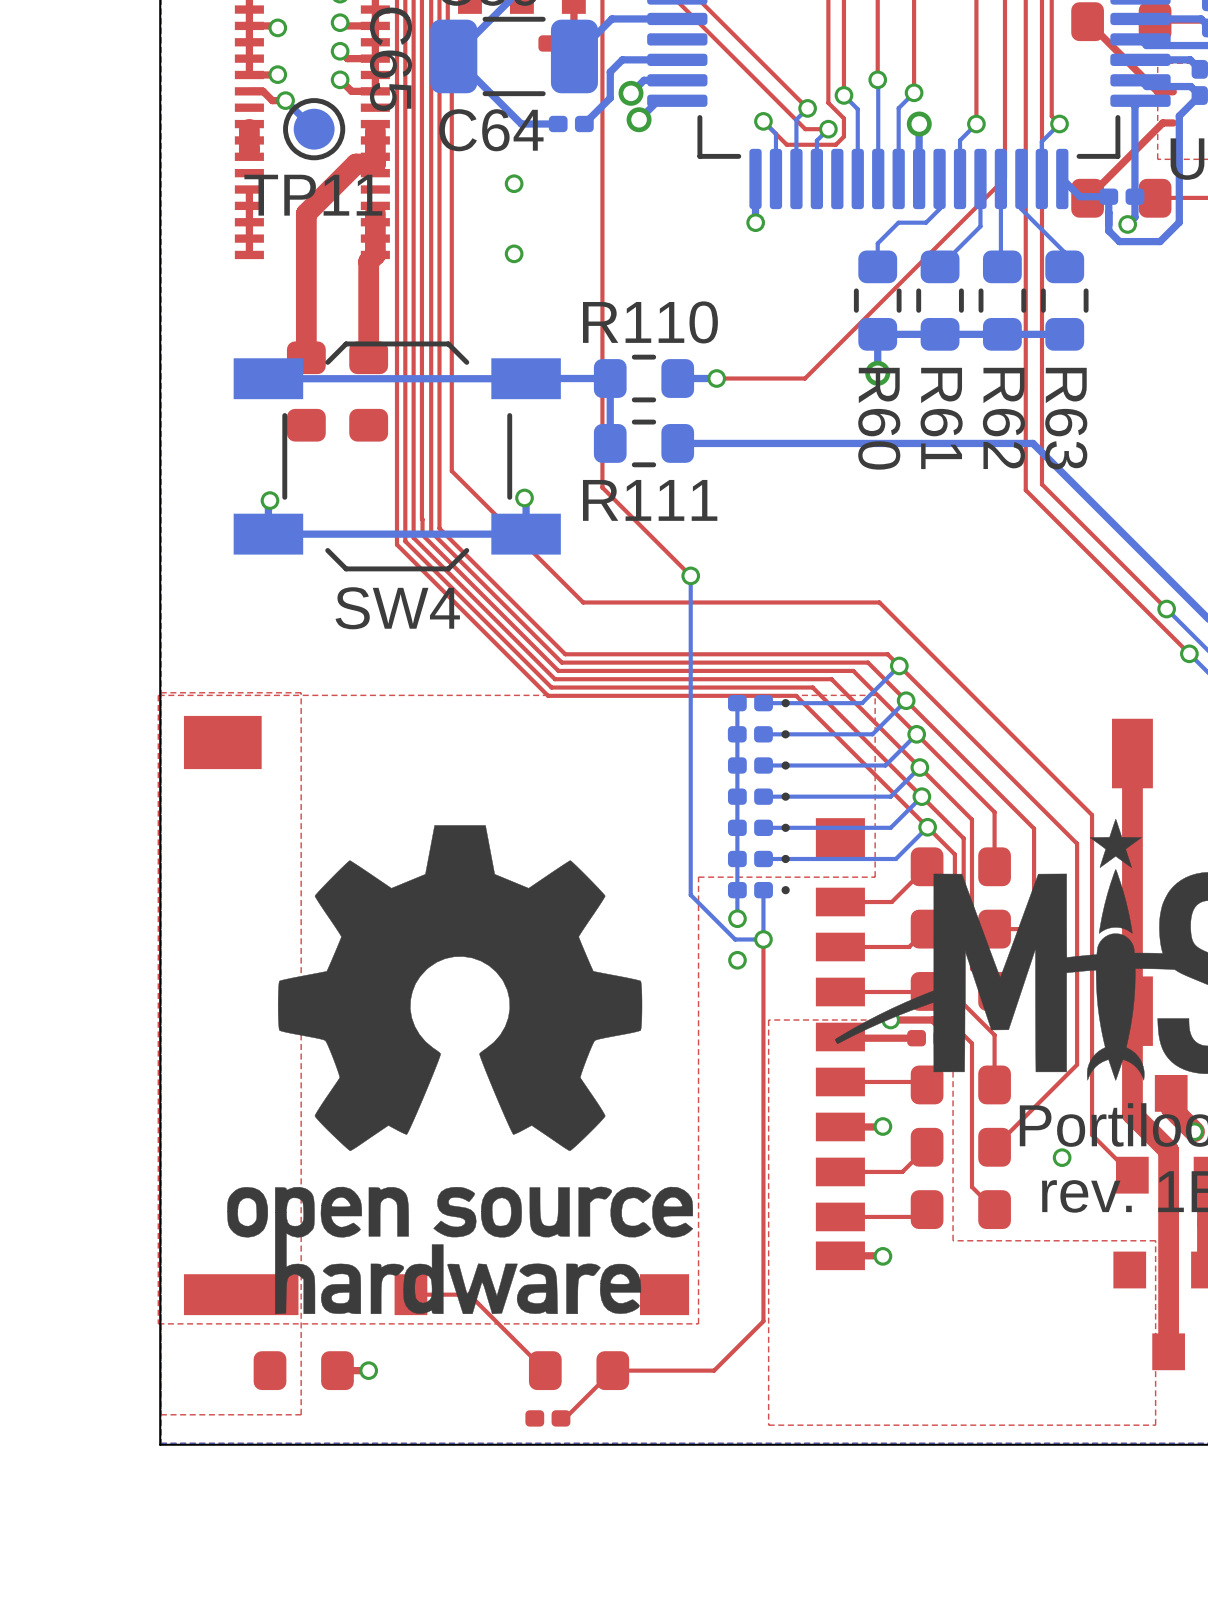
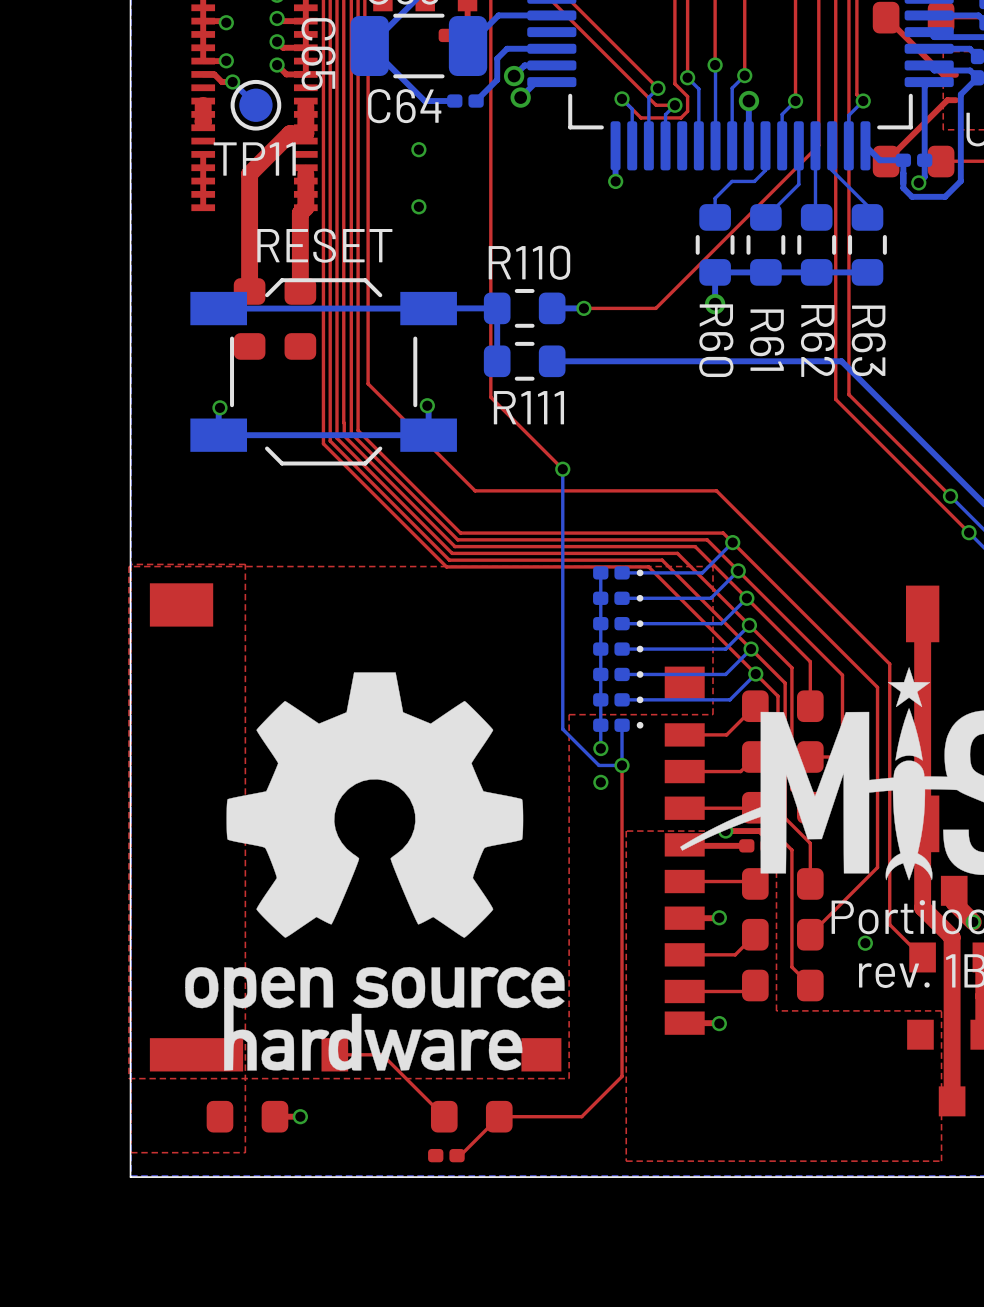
SW4 value: none -> RESET (324, 245)
SW4 name: SW4 (397, 608) -> none

